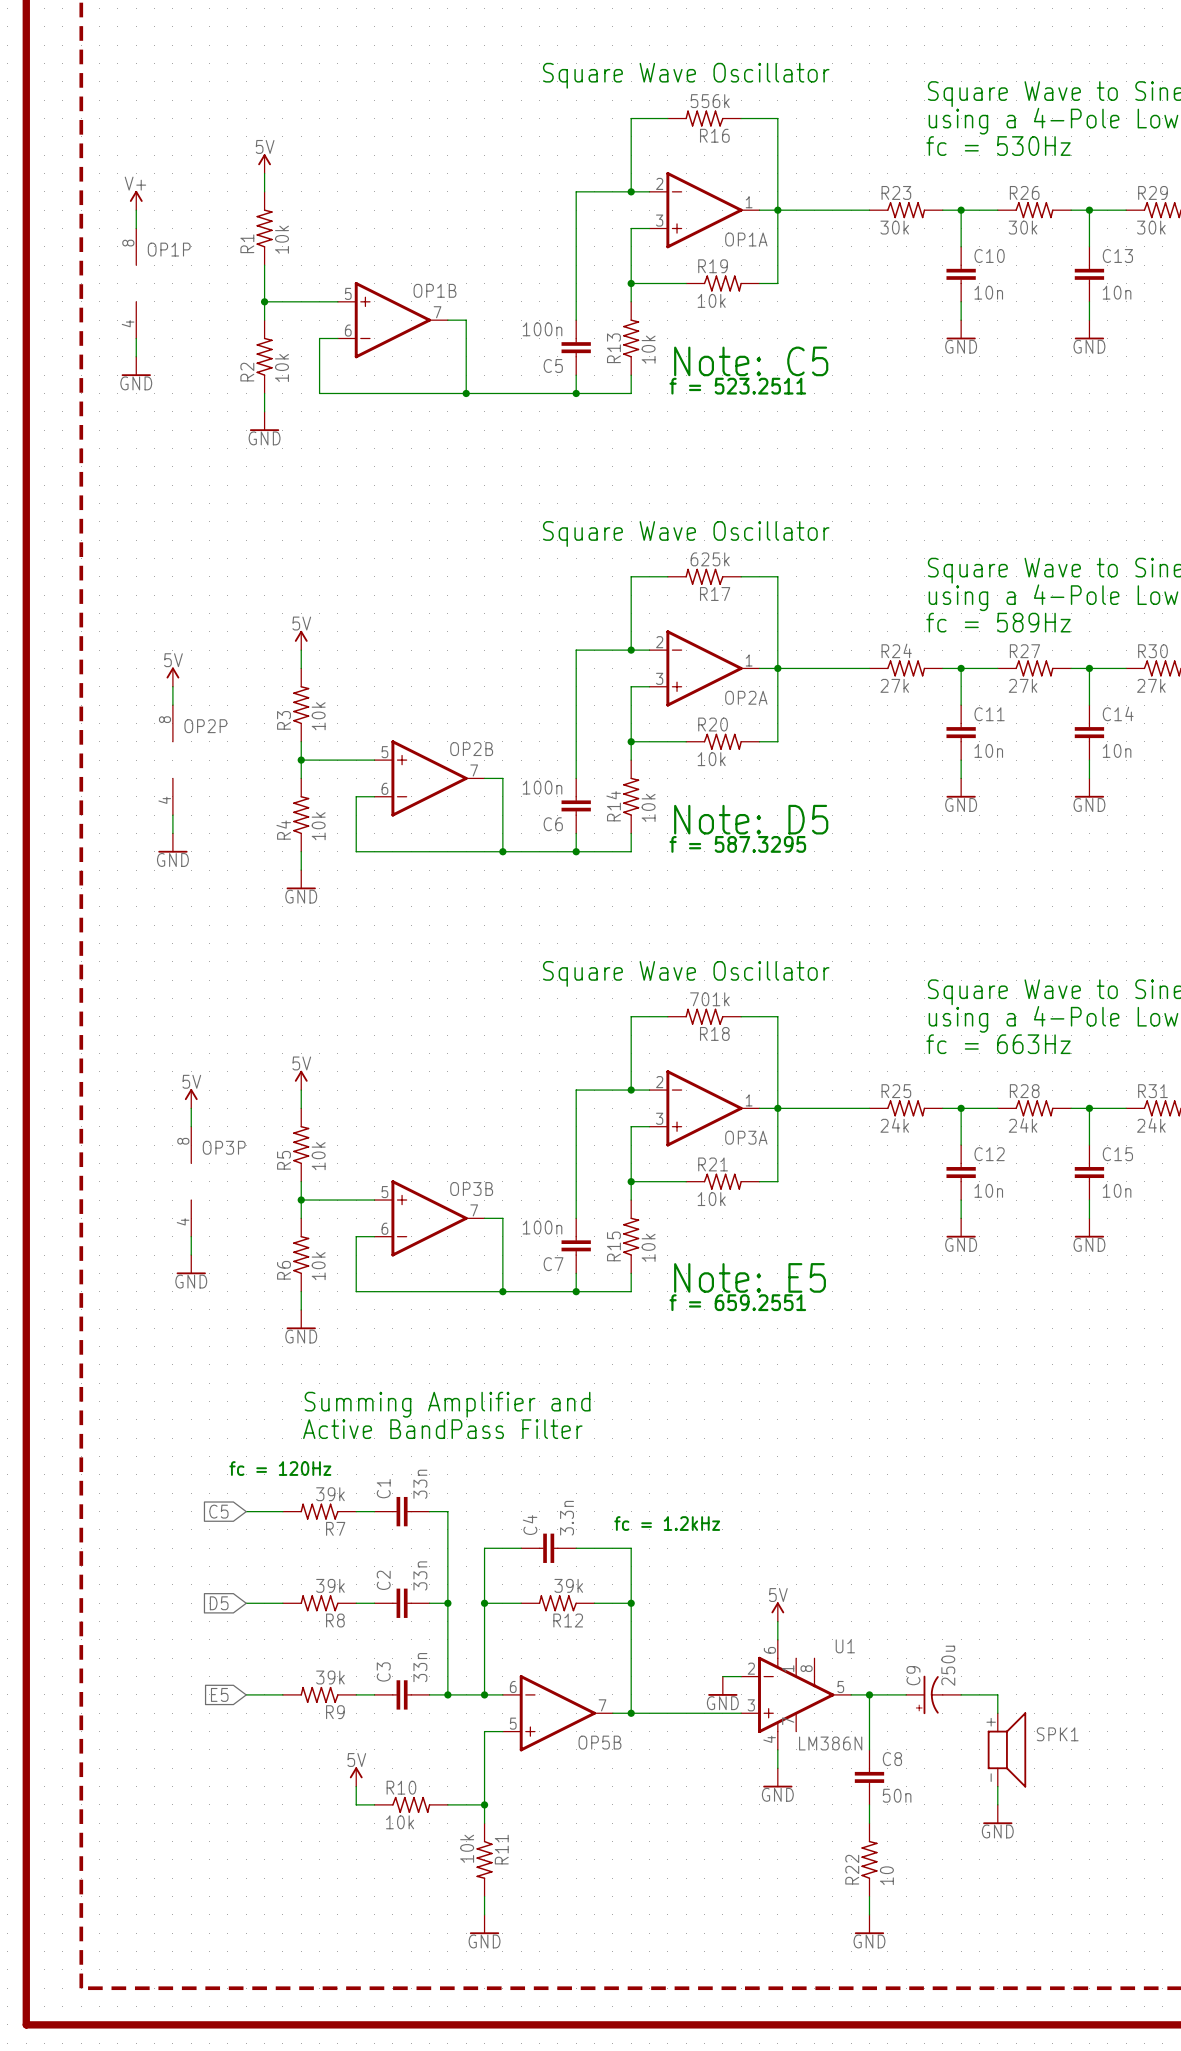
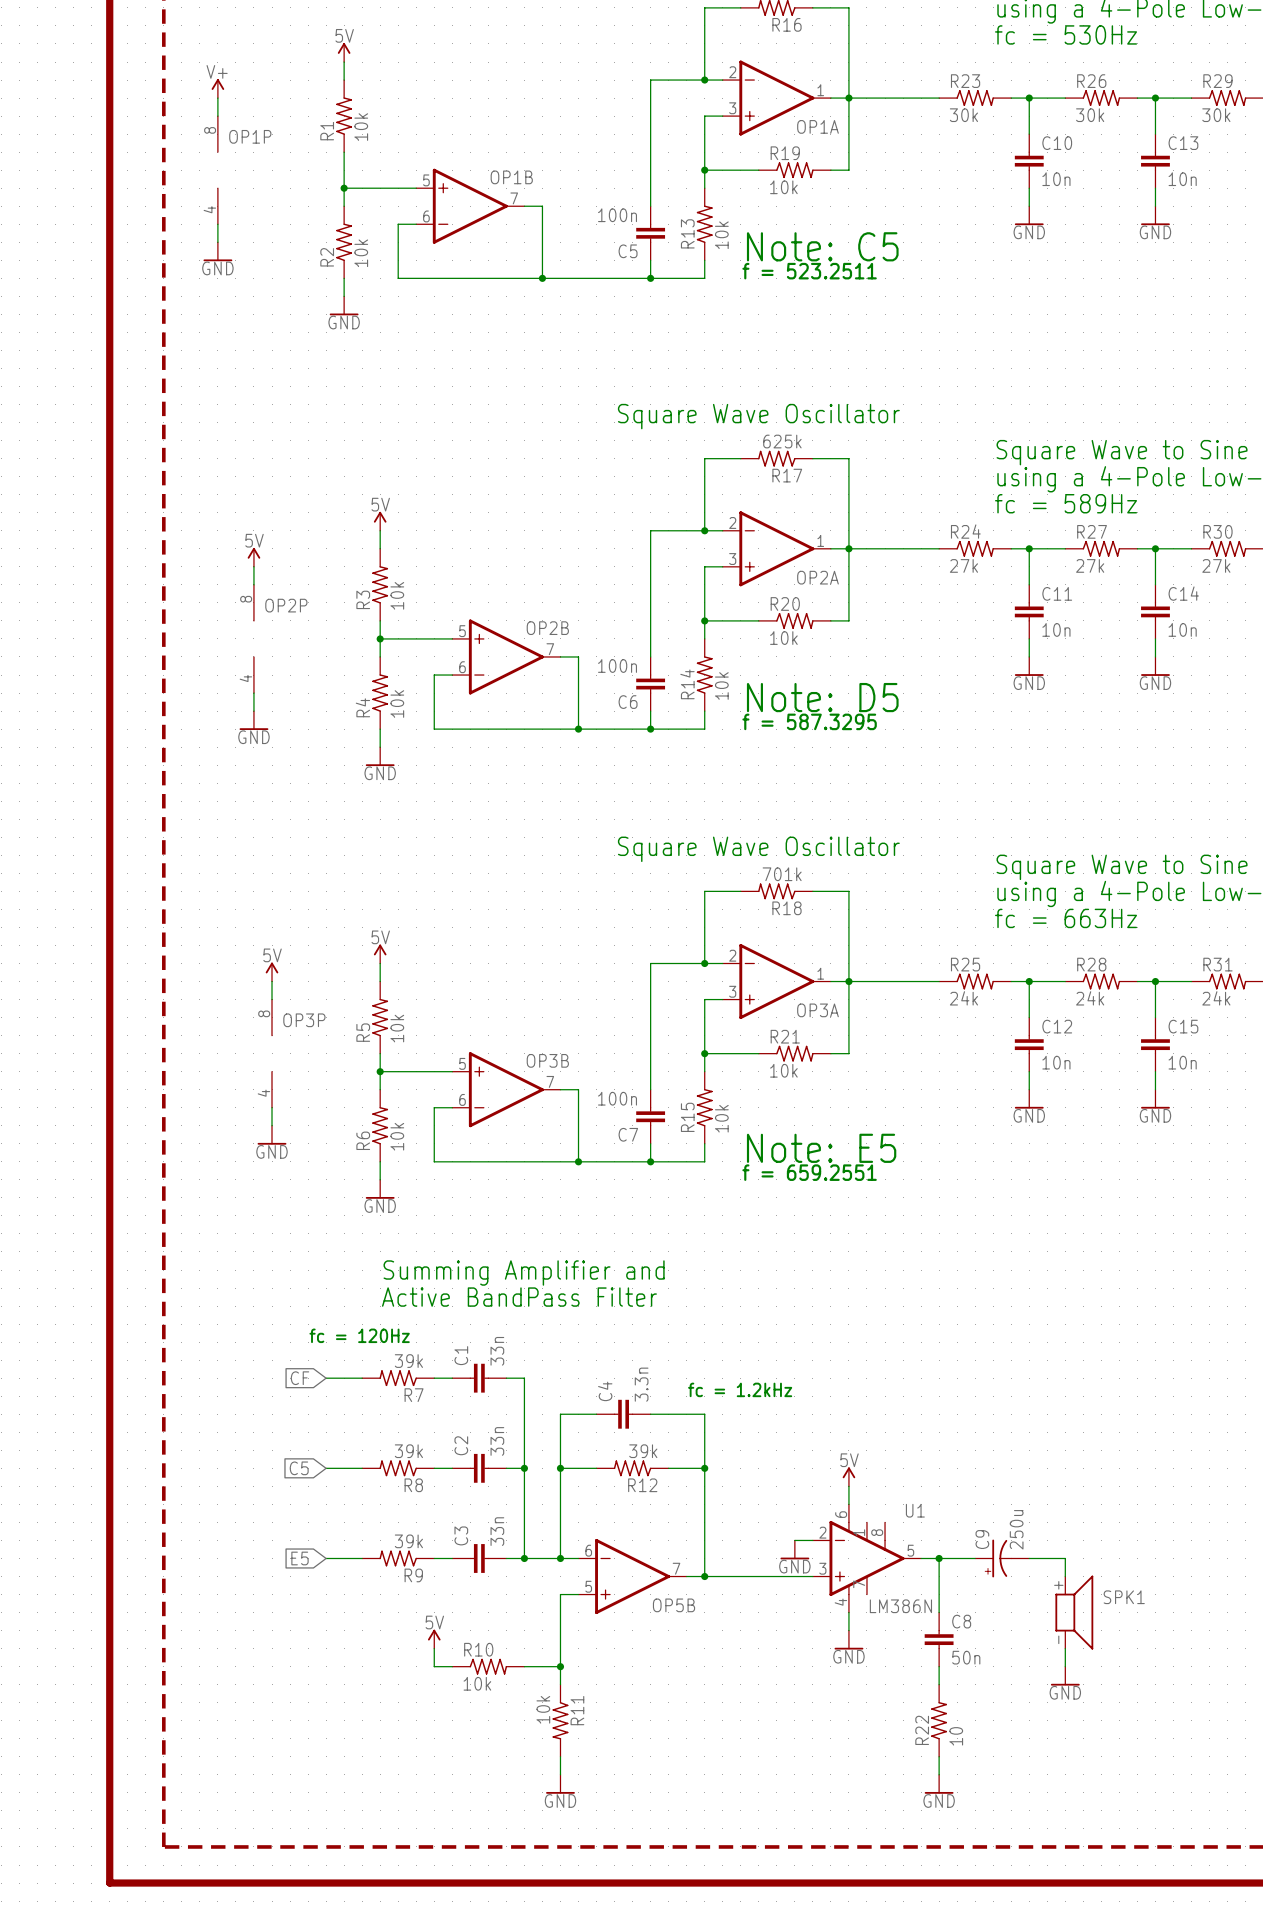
global label: C5 (218, 1511) -> CF (300, 1378)
global label: D5 (219, 1603) -> C5 (299, 1468)

